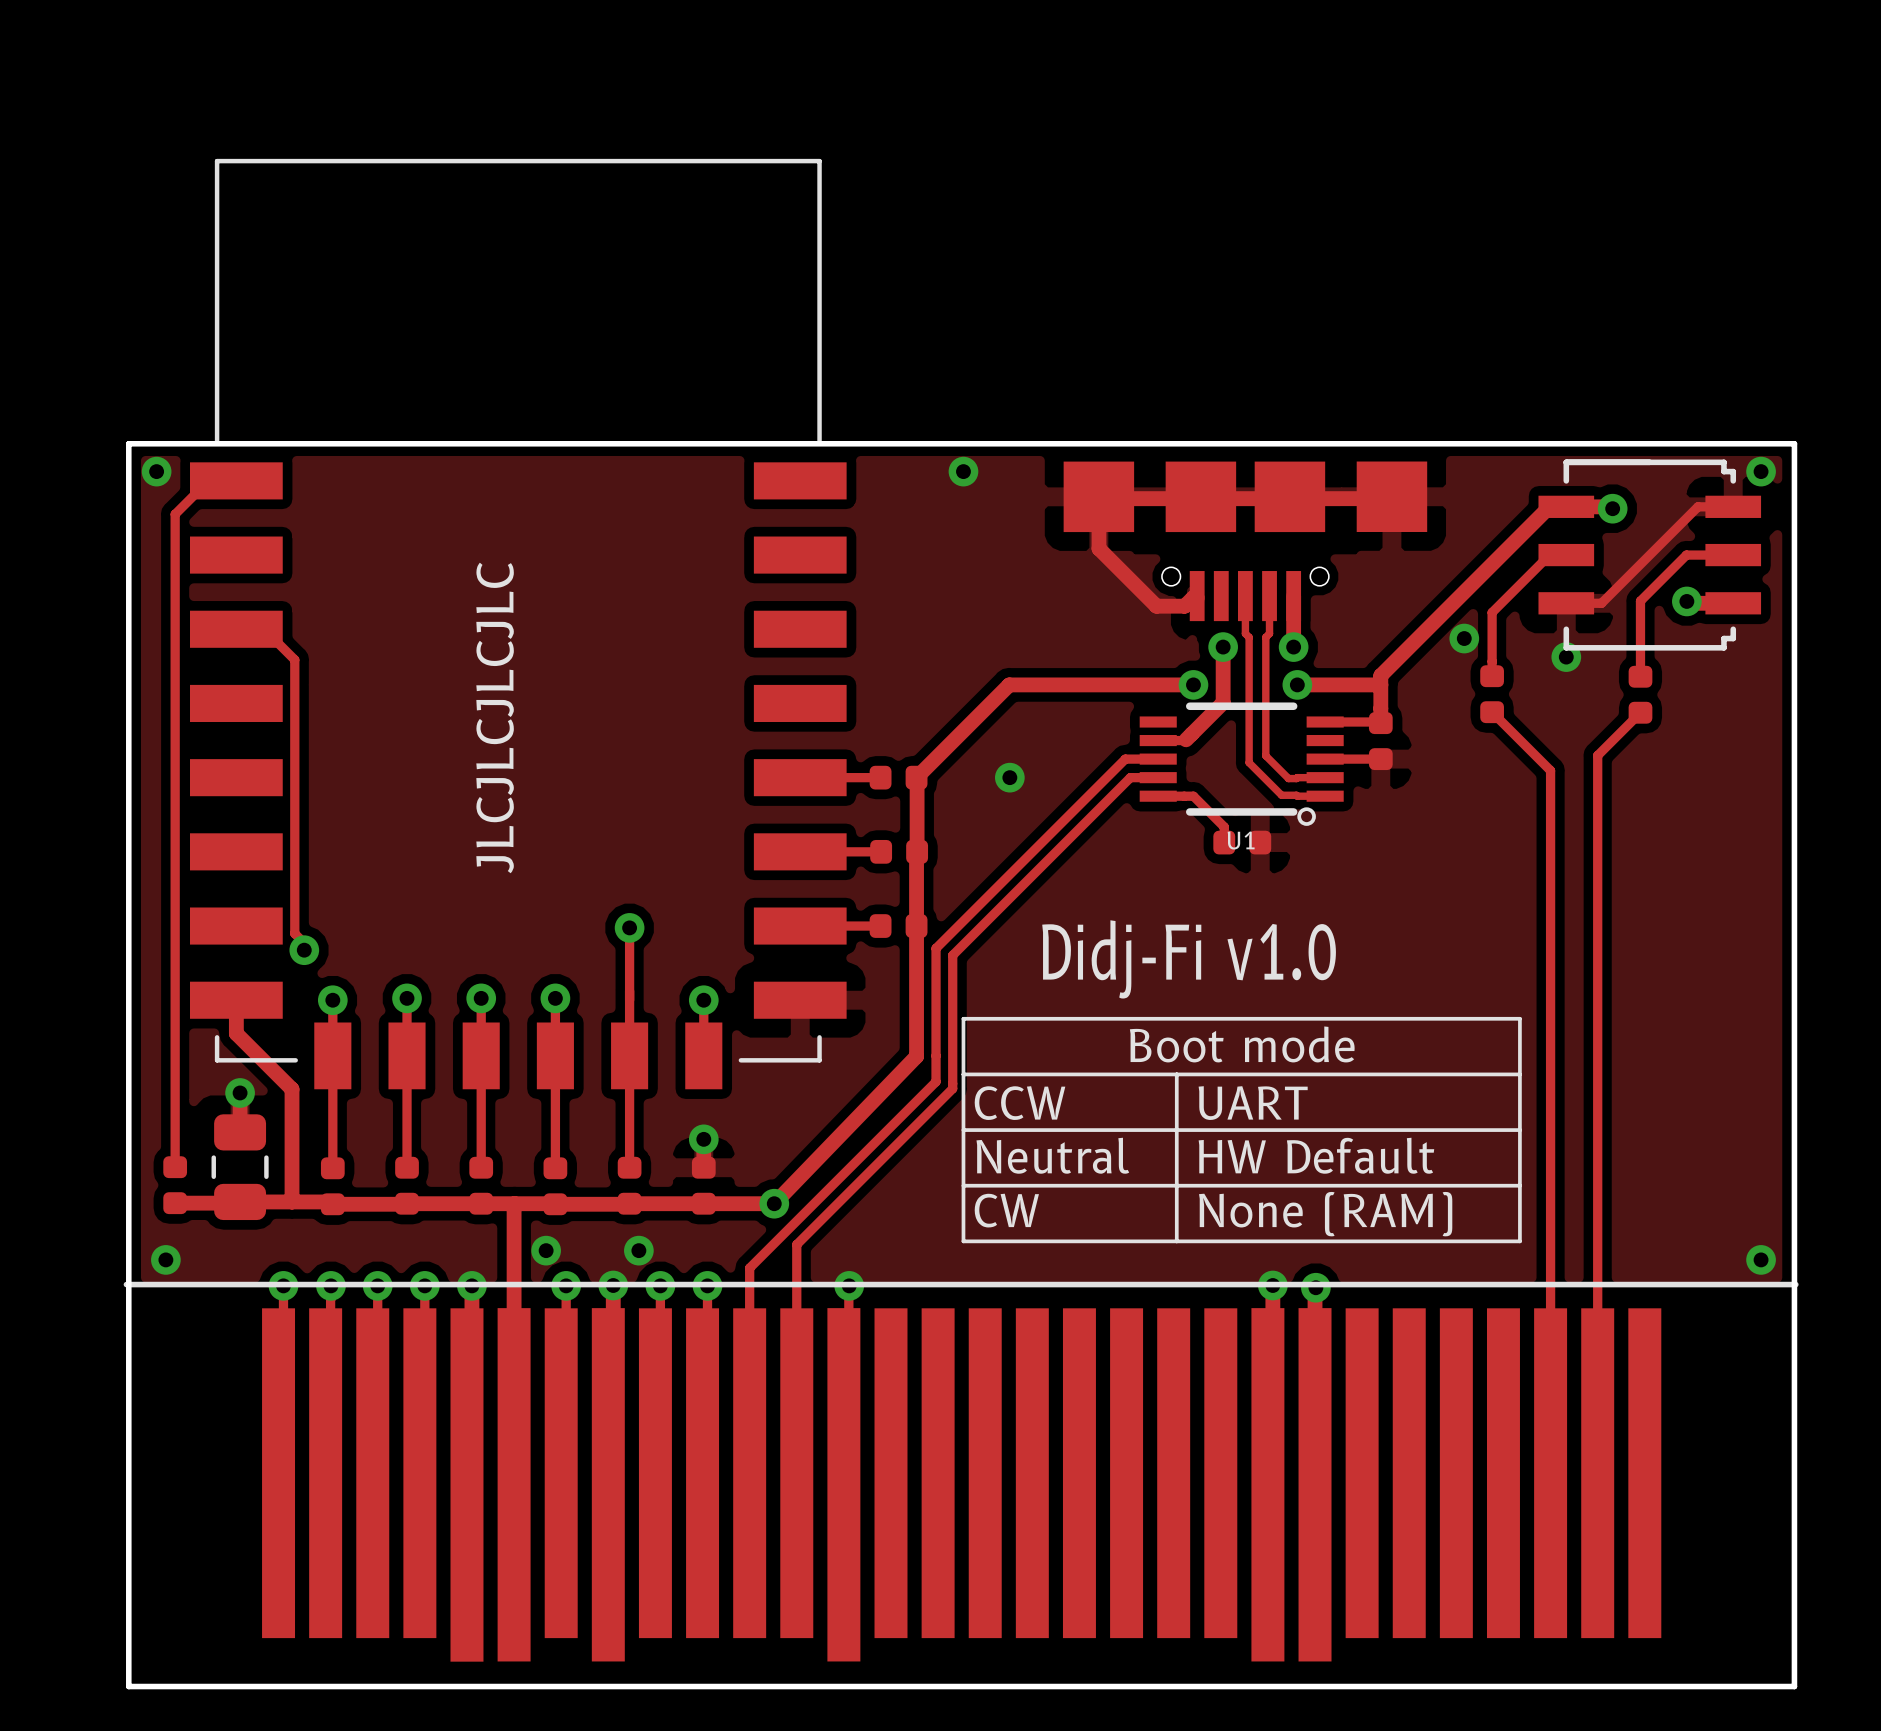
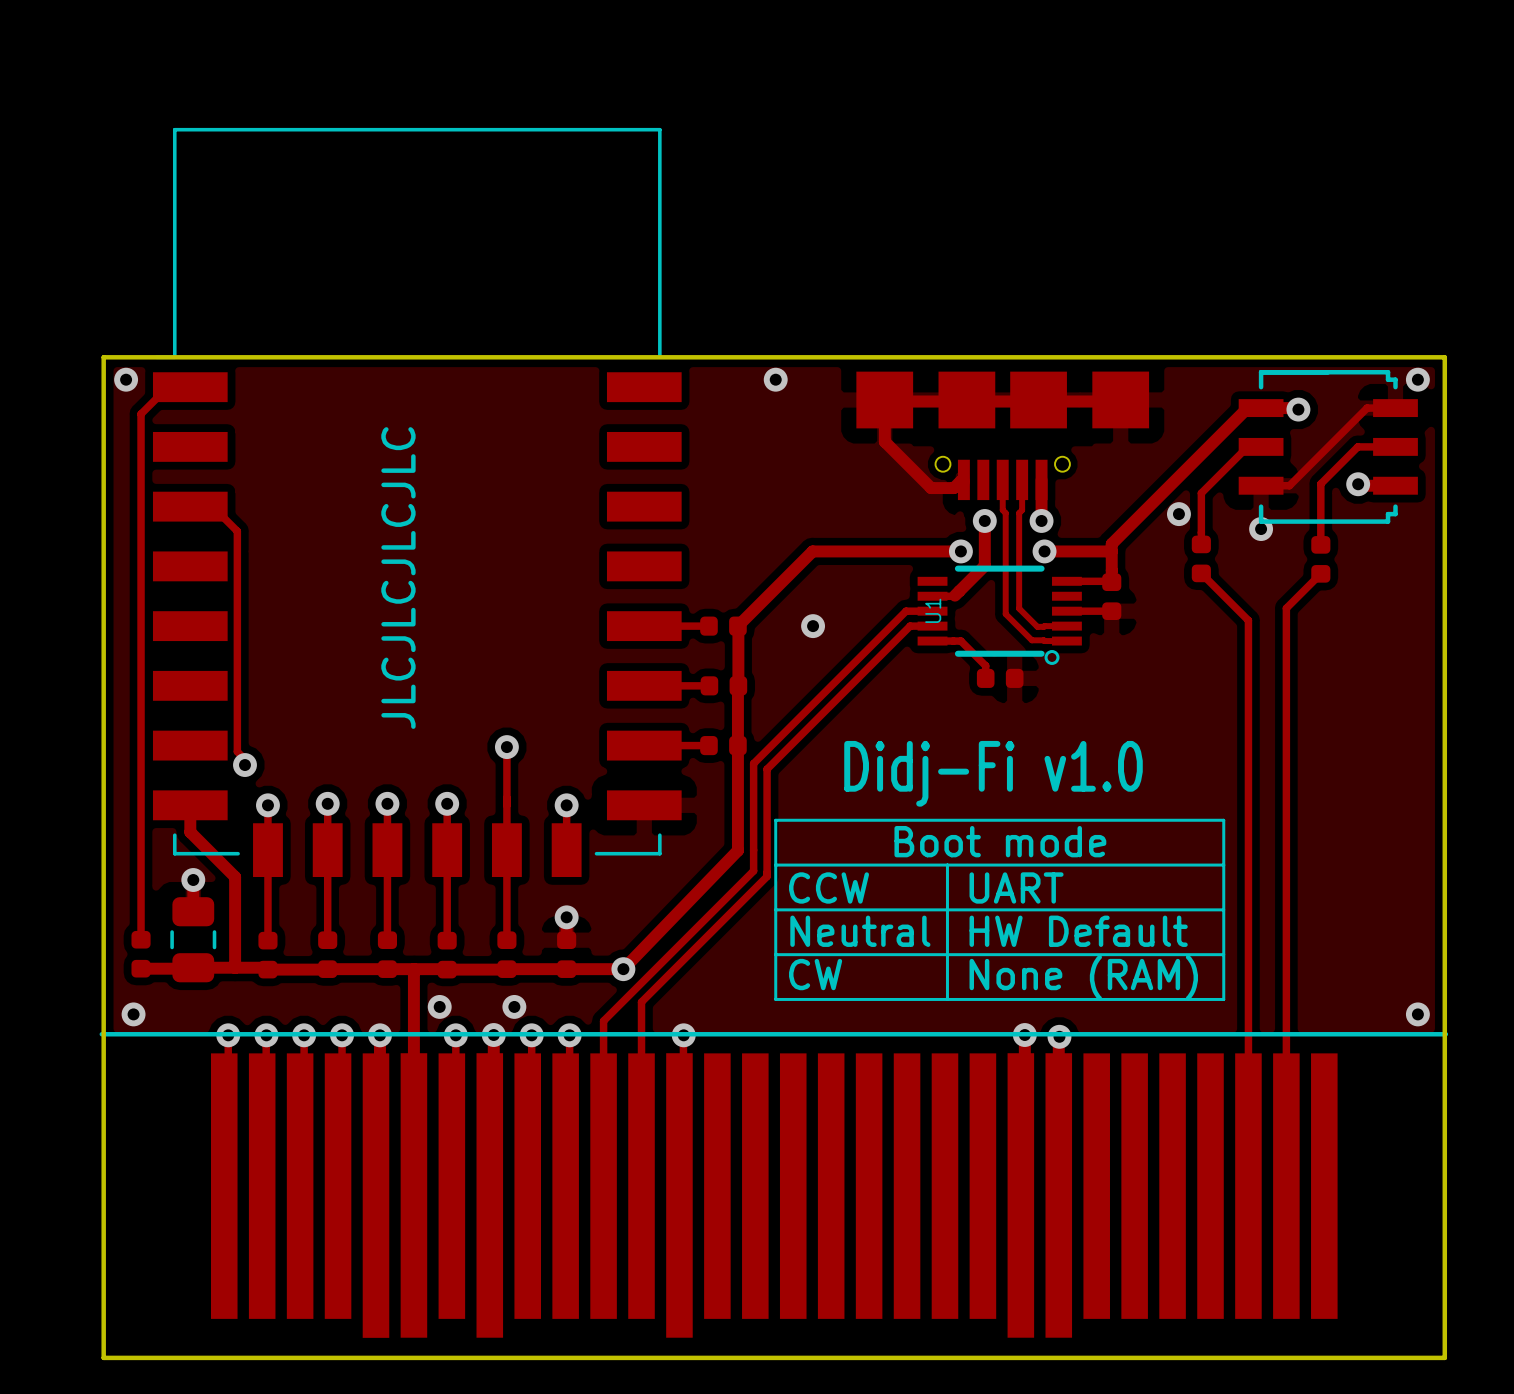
U1 name rotation: 0° (1241, 840) -> 90° counterclockwise (933, 610)
U1 name position: U1 (1241, 840) -> U1 (933, 610)

